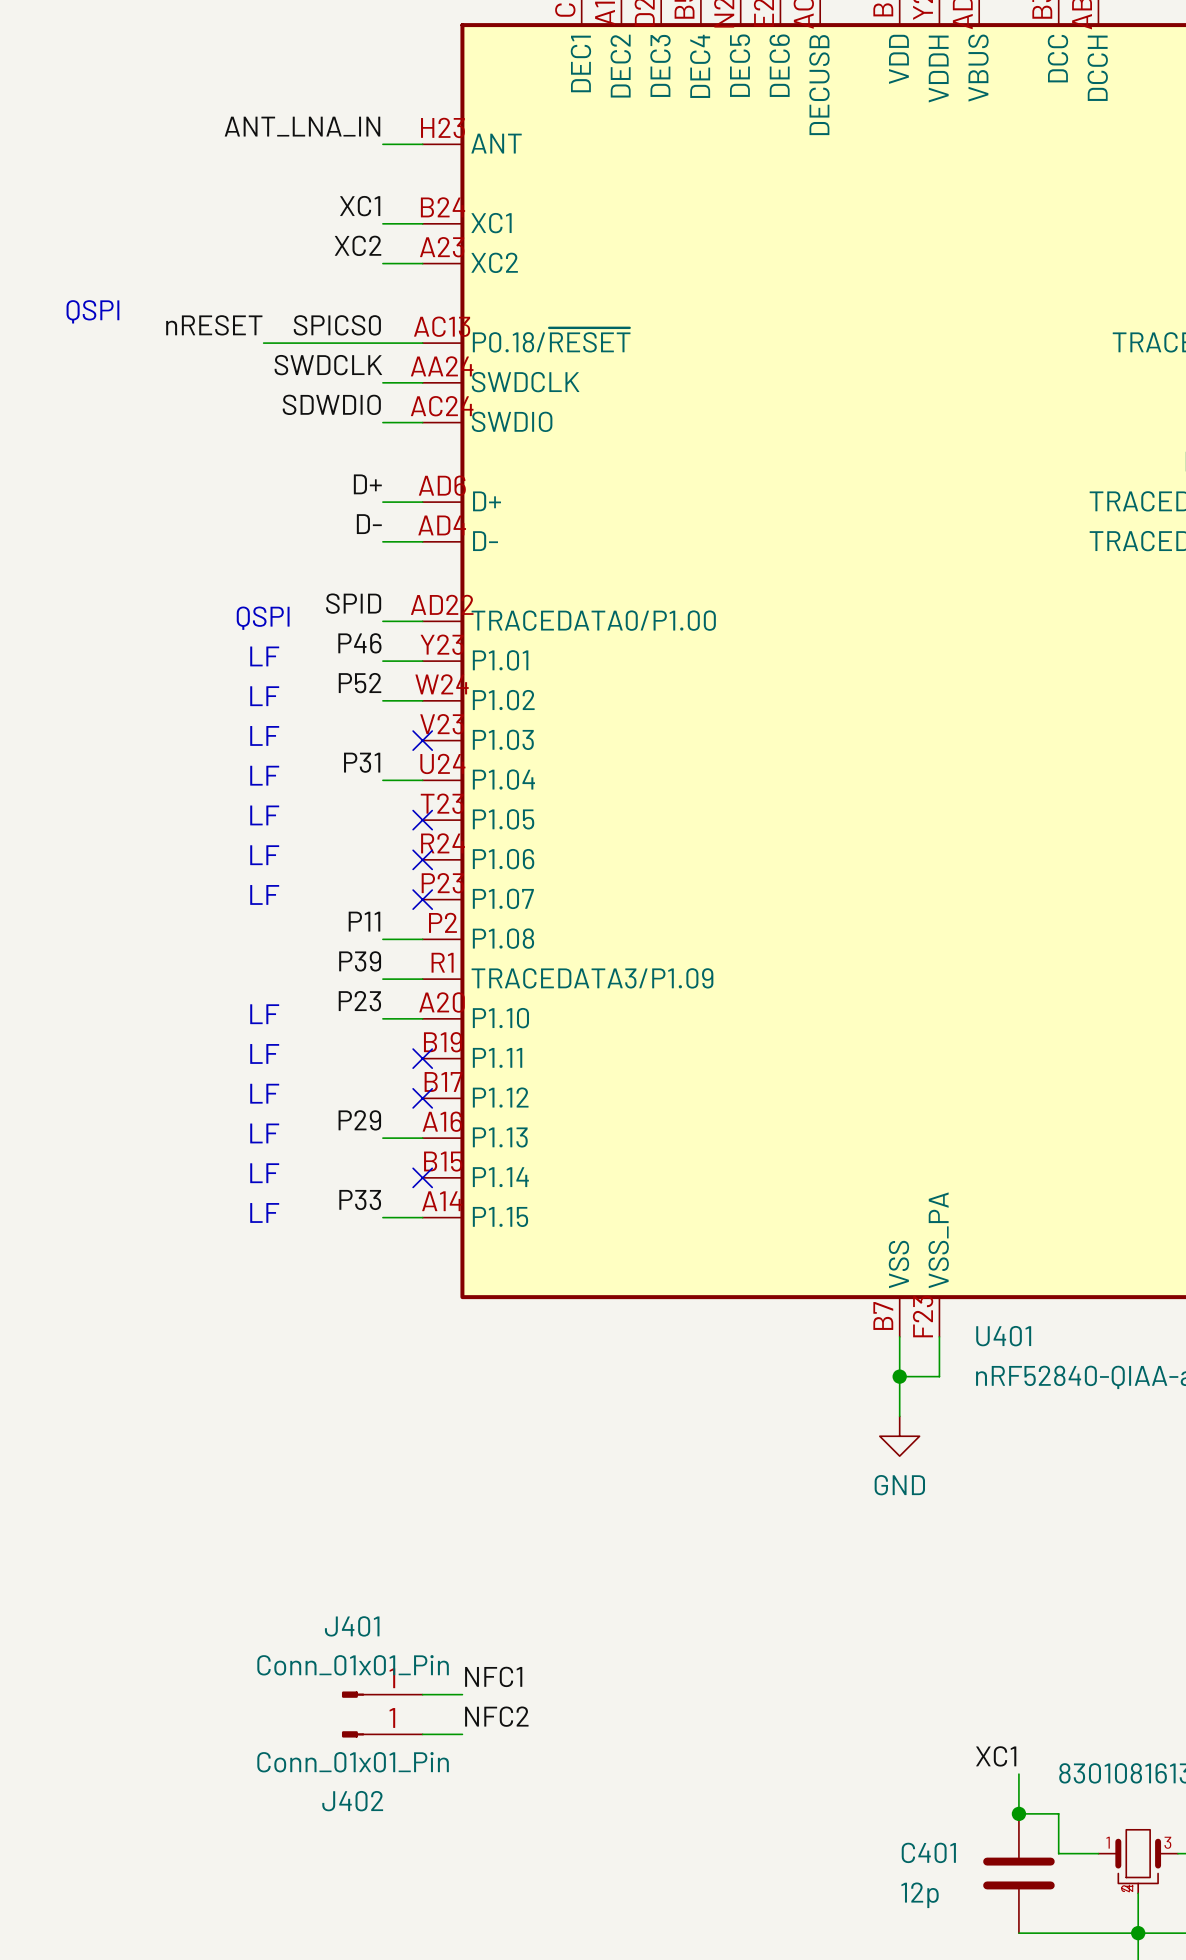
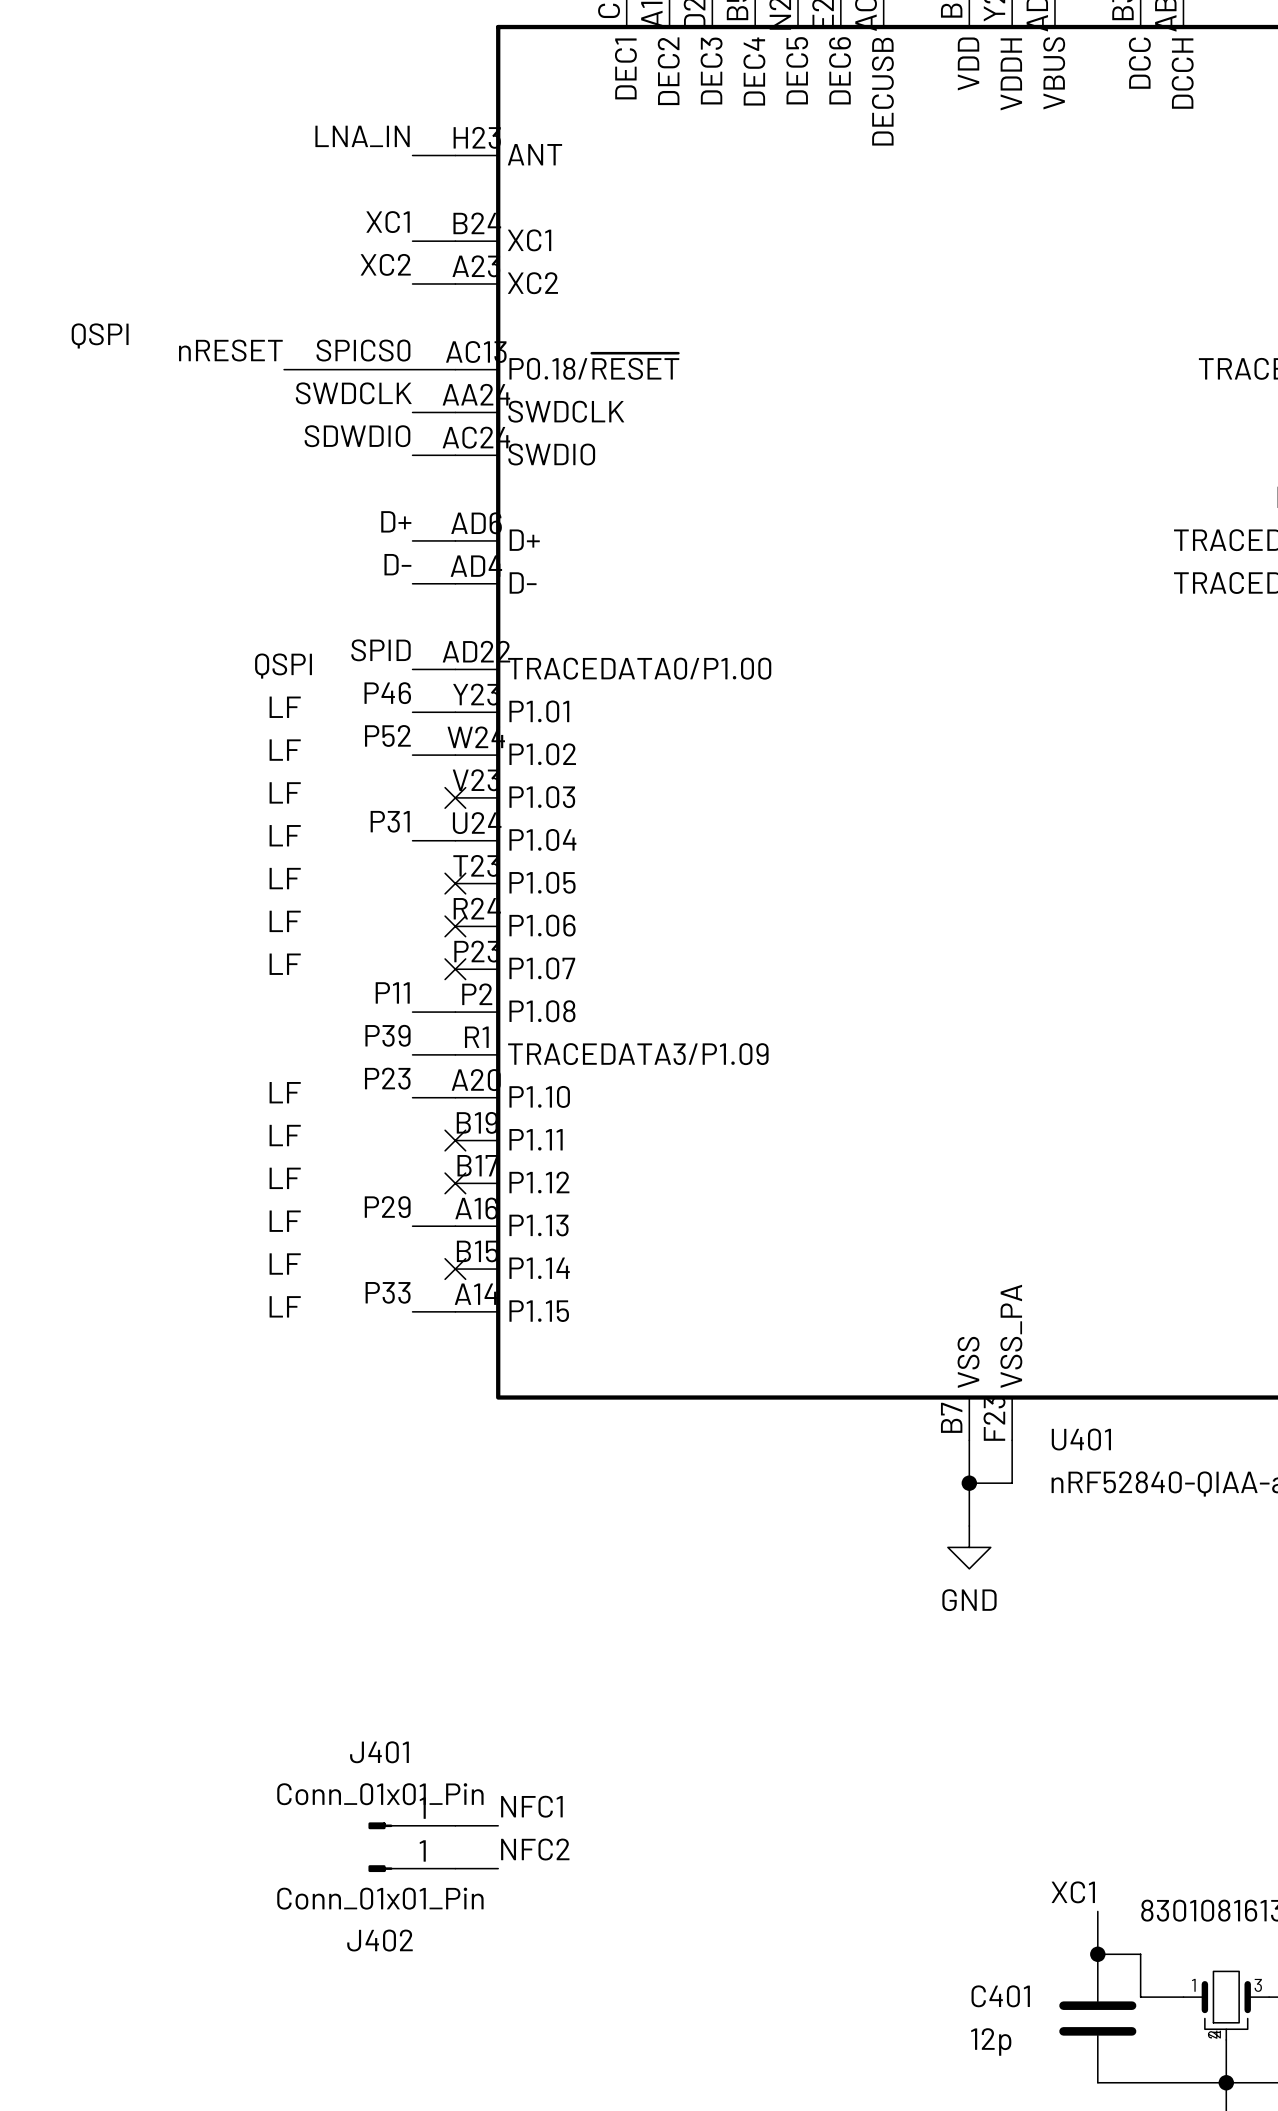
label: ANT_LNA_IN (302, 126) -> LNA_IN (362, 136)

